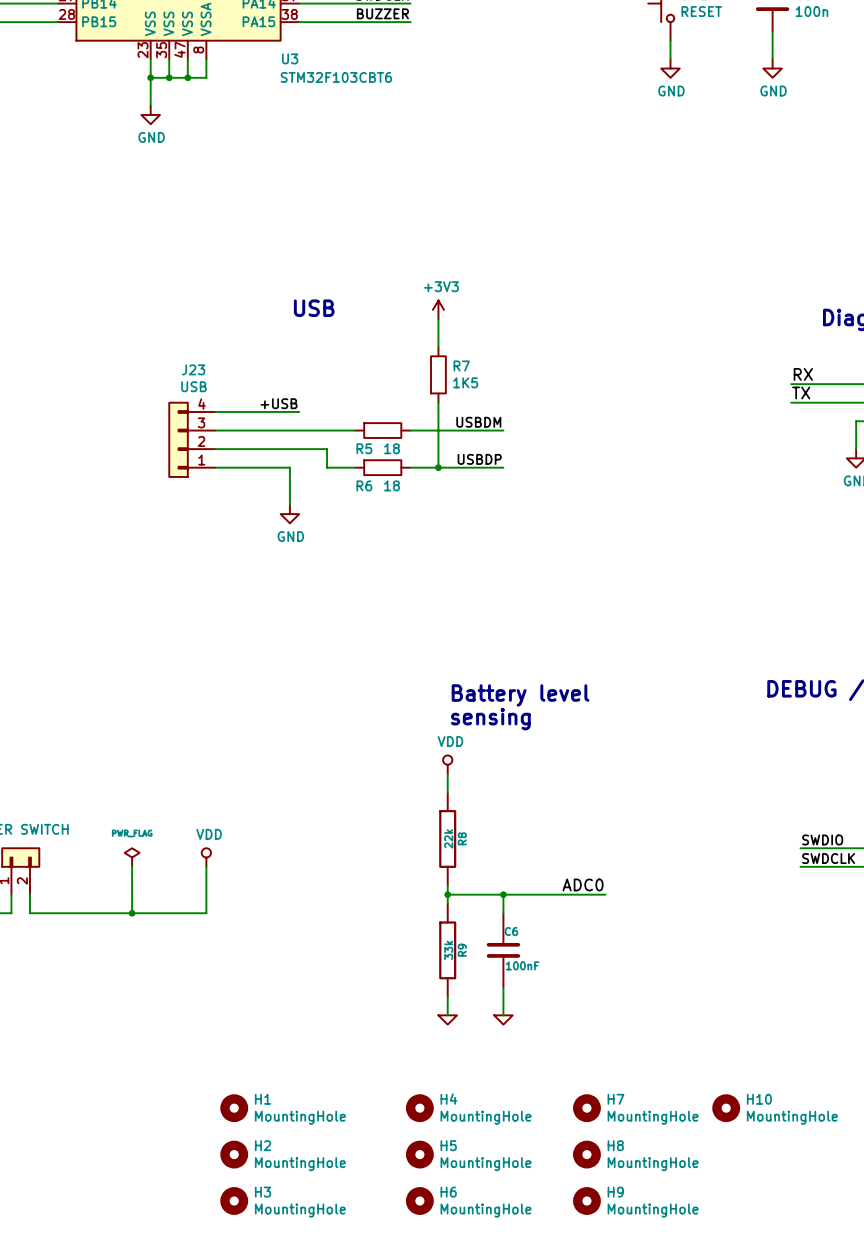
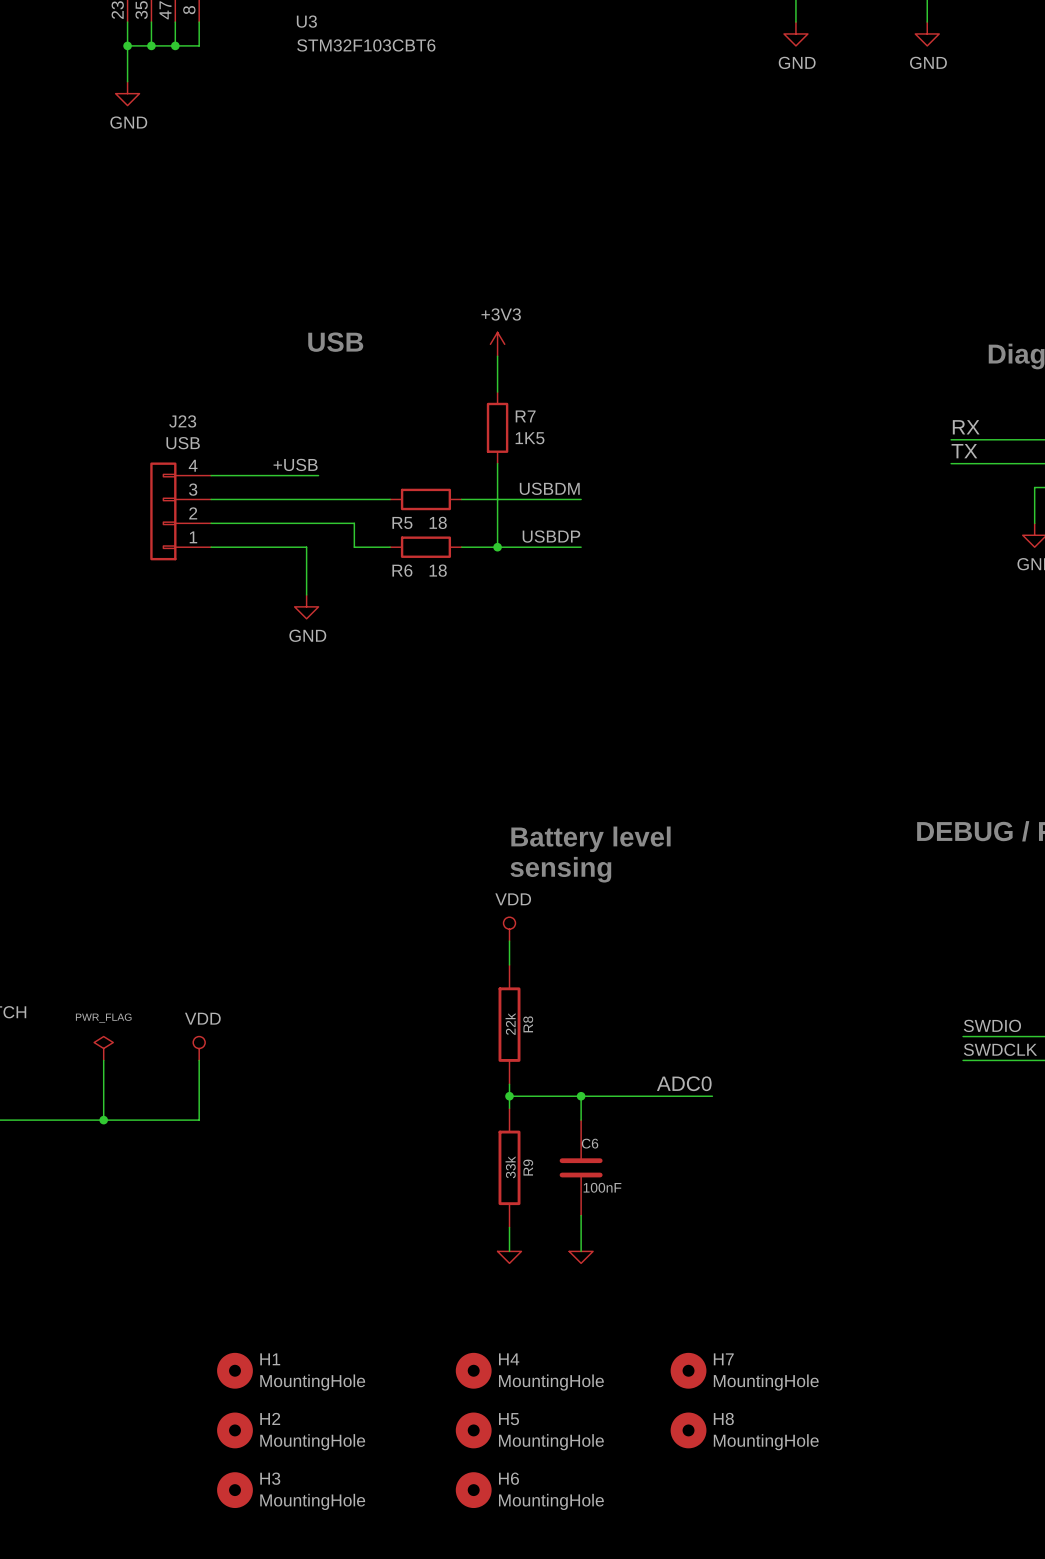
H10: MountingHole (726, 1108) -> none
H9: MountingHole (586, 1200) -> none

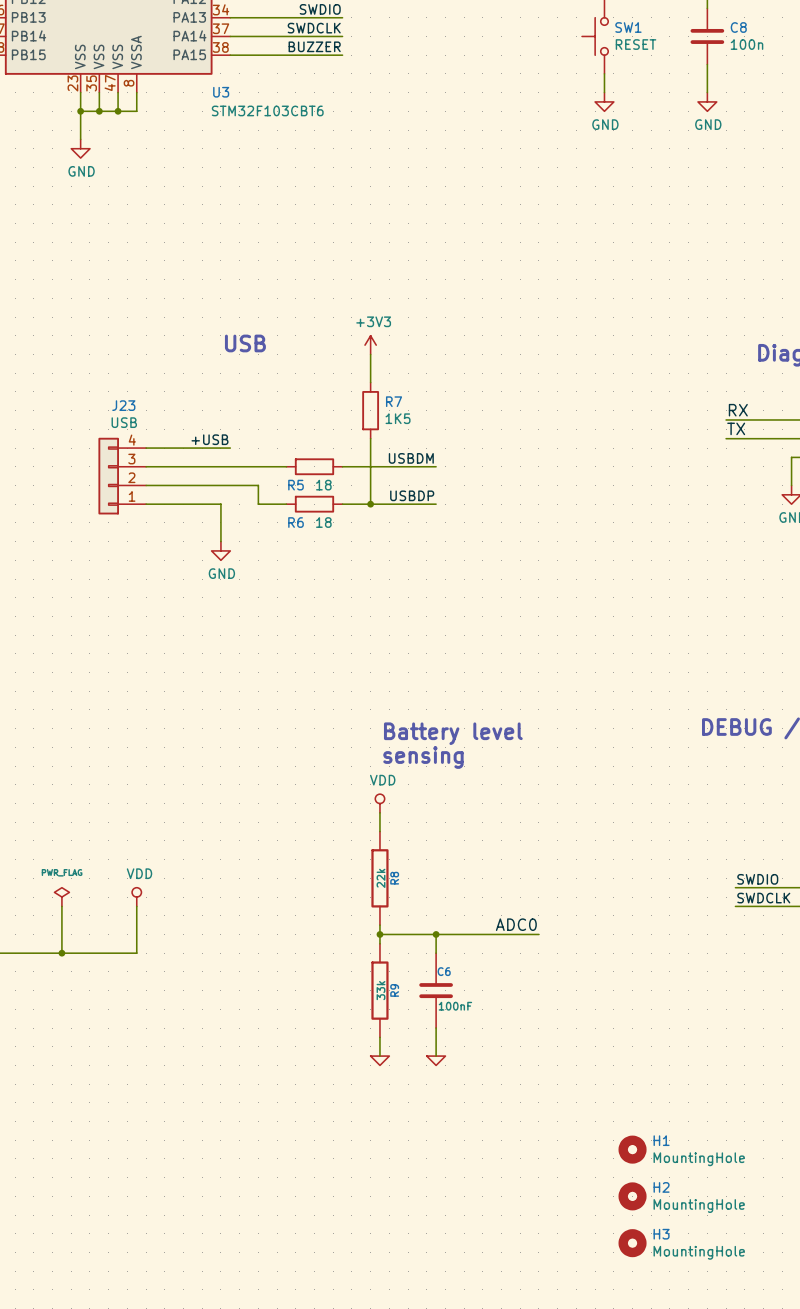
H1 position: (234, 1370) -> (632, 1149)
H4: MountingHole (473, 1370) -> none
H7: MountingHole (688, 1370) -> none
H2 position: (234, 1430) -> (632, 1196)
H5: MountingHole (473, 1430) -> none
H8: MountingHole (688, 1430) -> none
H3 position: (234, 1490) -> (632, 1243)
H6: MountingHole (473, 1490) -> none

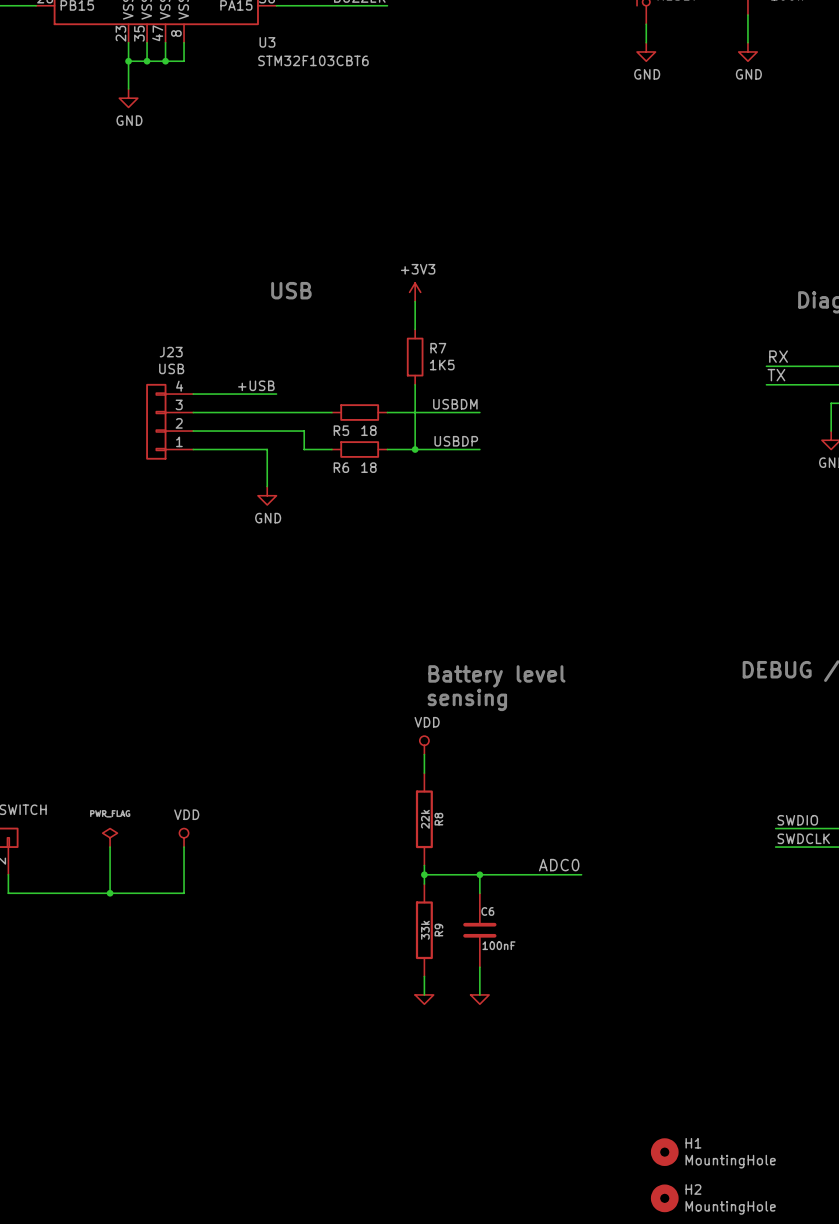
H1 position: (632, 1149) -> (664, 1152)
H2 position: (632, 1196) -> (664, 1198)
H3: MountingHole (632, 1243) -> none

